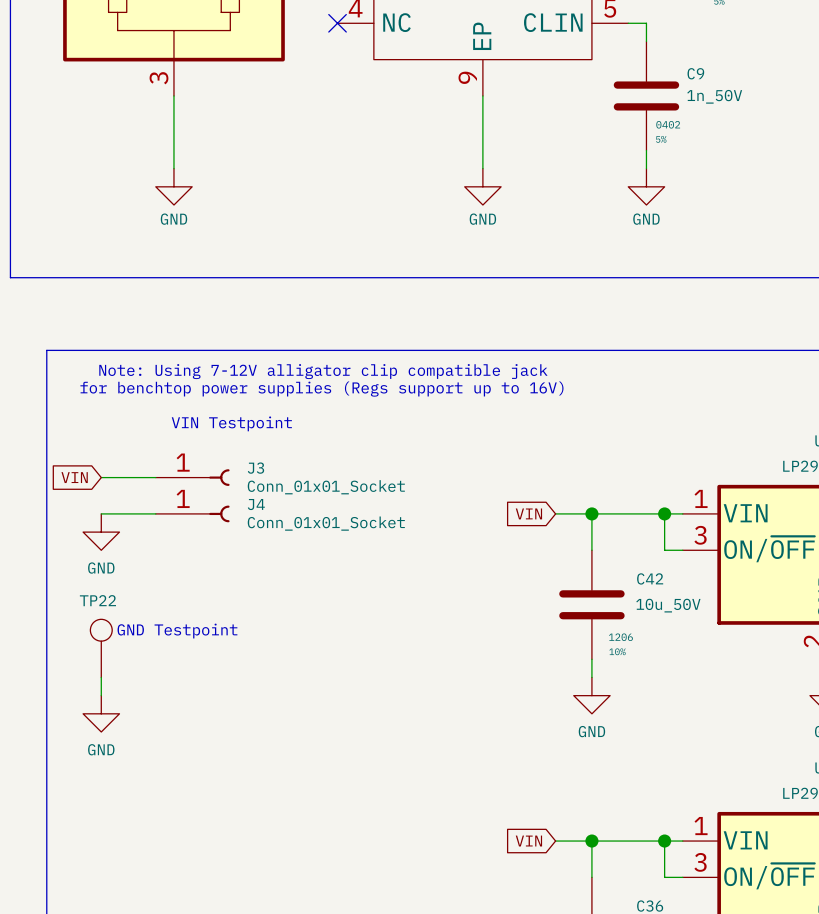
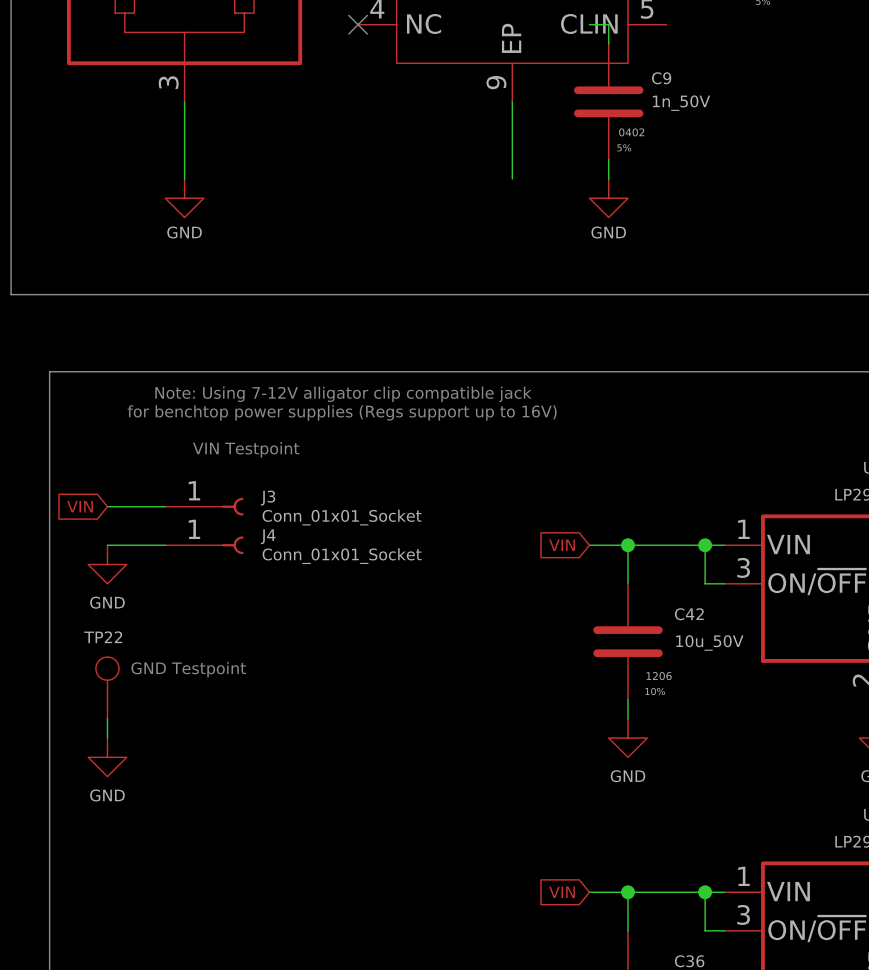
wire: (628, 23) (646, 23) (646, 41) -> (589, 24) (608, 24) (608, 43)
C9 position: (646, 95) -> (608, 101)
wire: (646, 150) (646, 168) -> (608, 159) (608, 178)
power symbol: GND (482, 186) -> none
power symbol: none -> GND (608, 198)
power symbol: GND (646, 186) -> none

